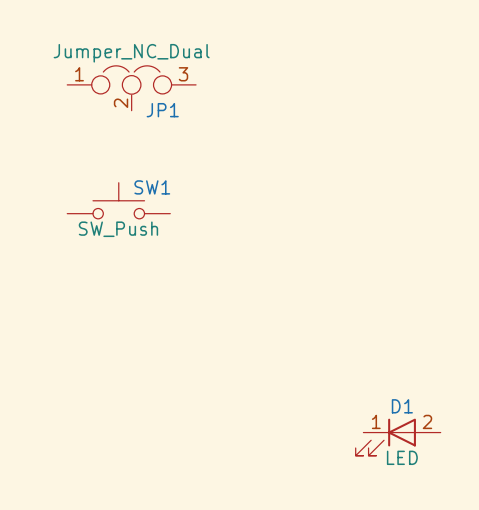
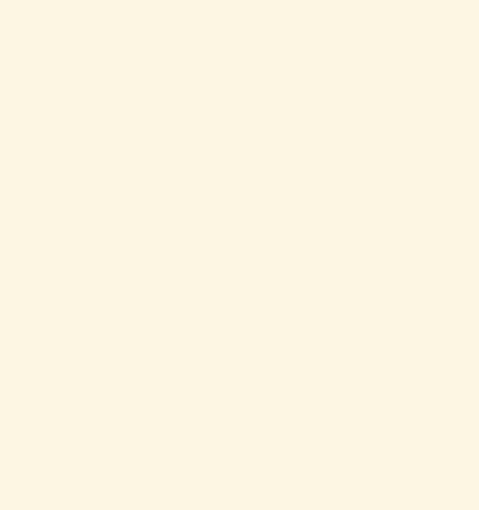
JP1: Jumper_NC_Dual (131, 88) -> none
SW1: SW_Push (118, 200) -> none
D1: LED (398, 437) -> none

